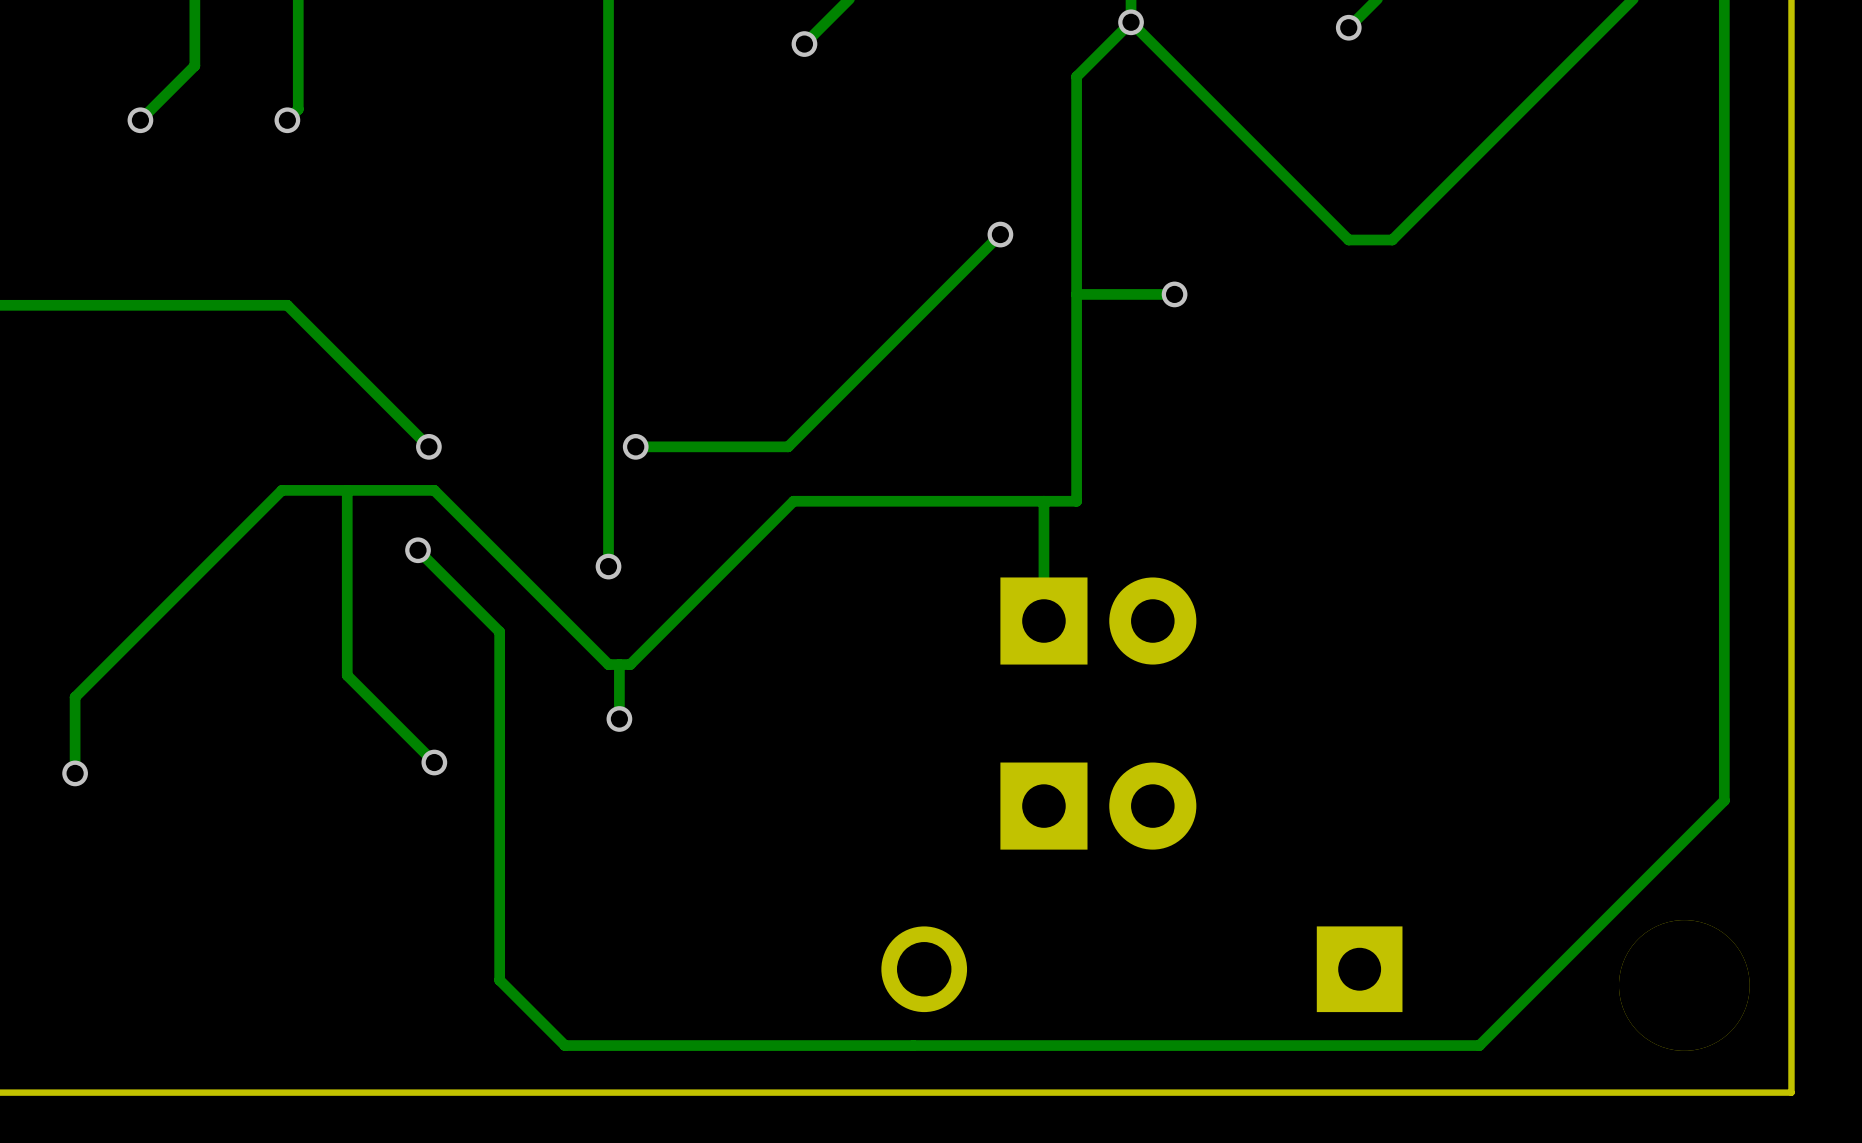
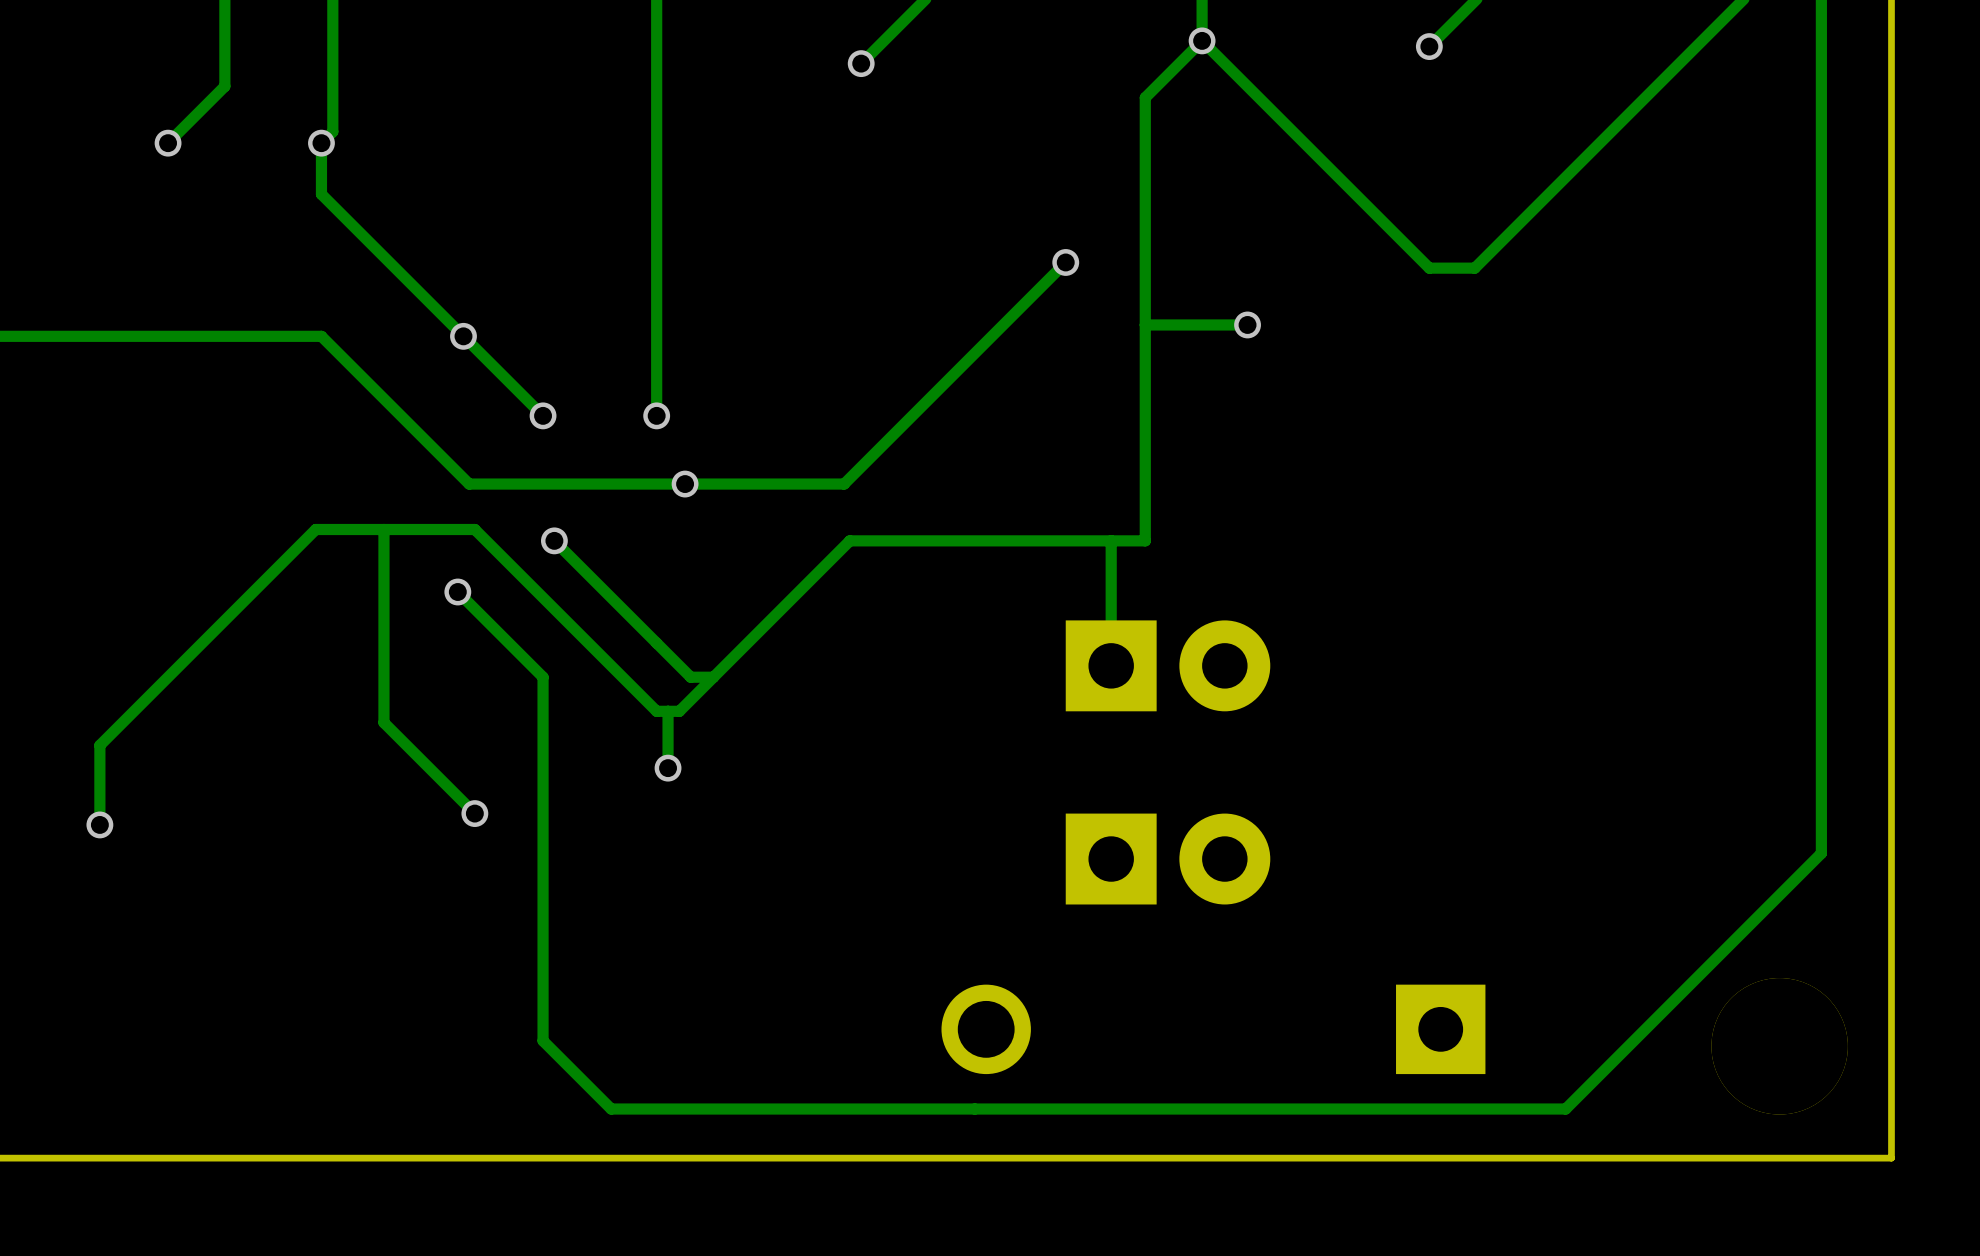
track: none -> (321, 143) (321, 194) (543, 415)
via: none -> (463, 336)
via: none -> (543, 415)
track: (608, 381) (608, 566) -> none
via: none -> (656, 415)
via: (428, 446) -> none
track: none -> (685, 484) (469, 484)
track: none -> (554, 540) (690, 677) (713, 677)
via: none -> (554, 540)
via: (608, 566) -> none

